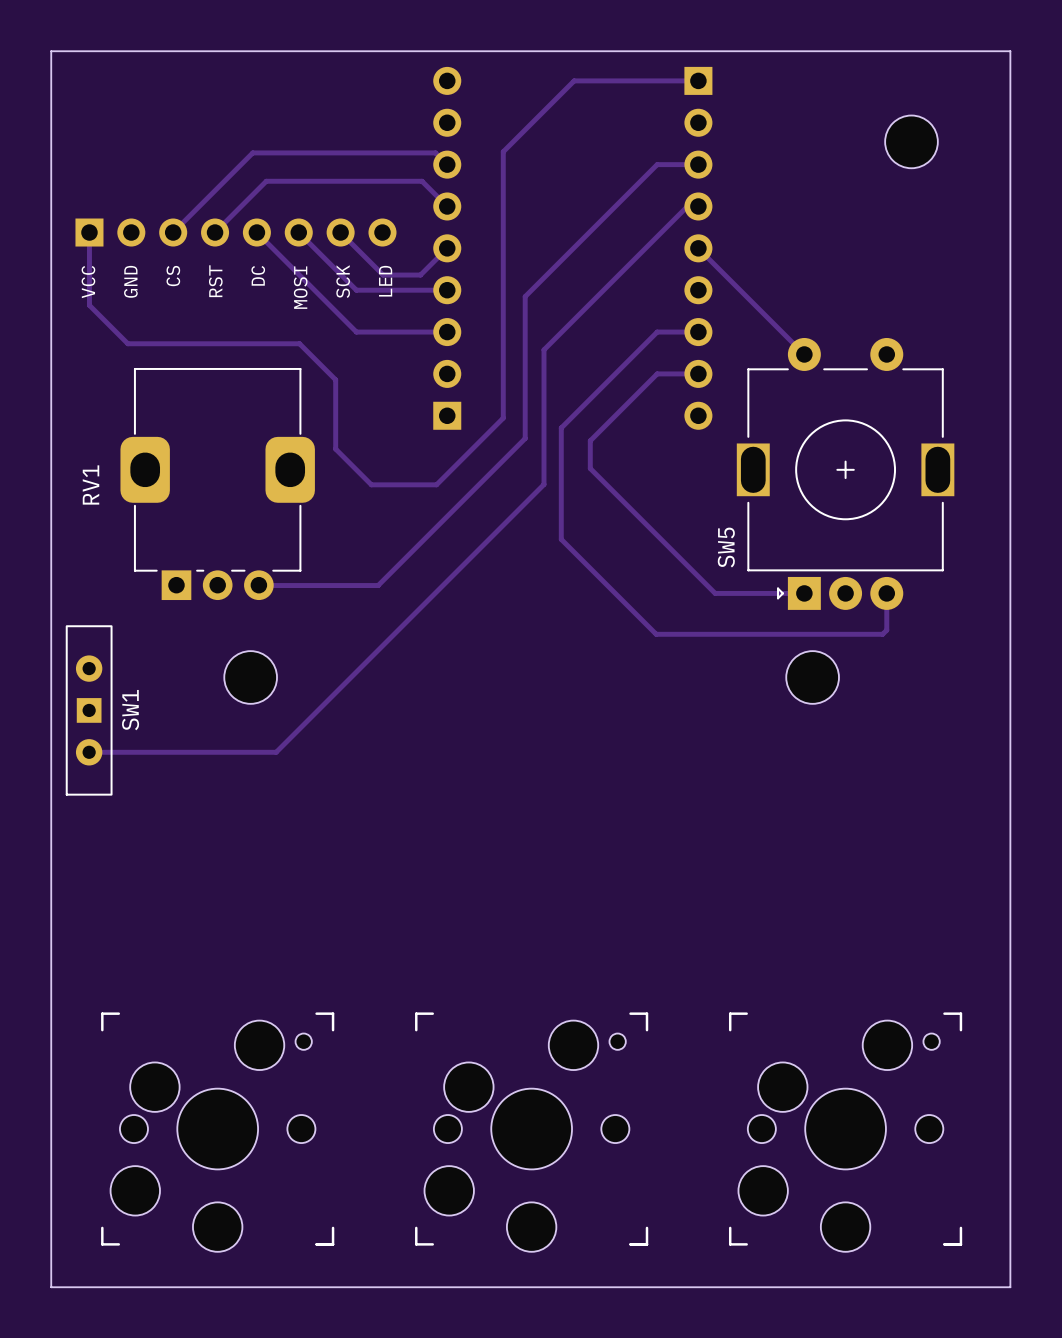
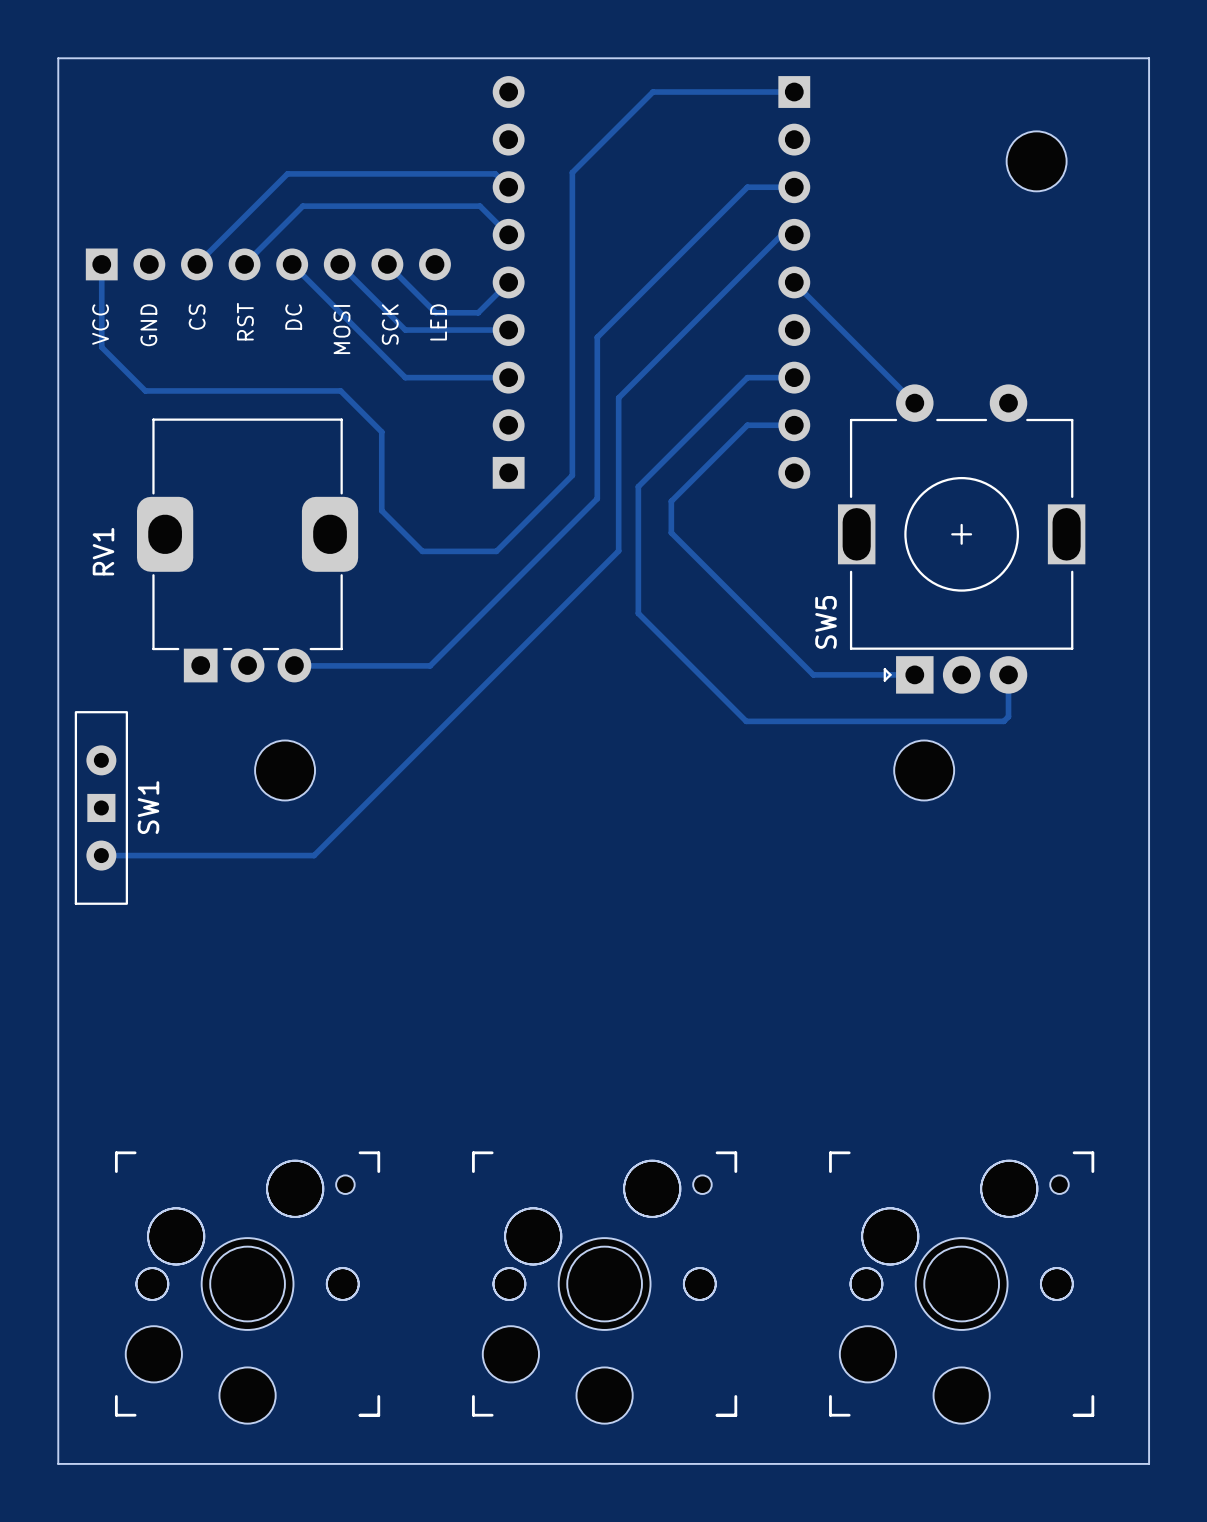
part: none -> (247, 1241)
part: none -> (604, 1241)
part: none -> (961, 1241)

